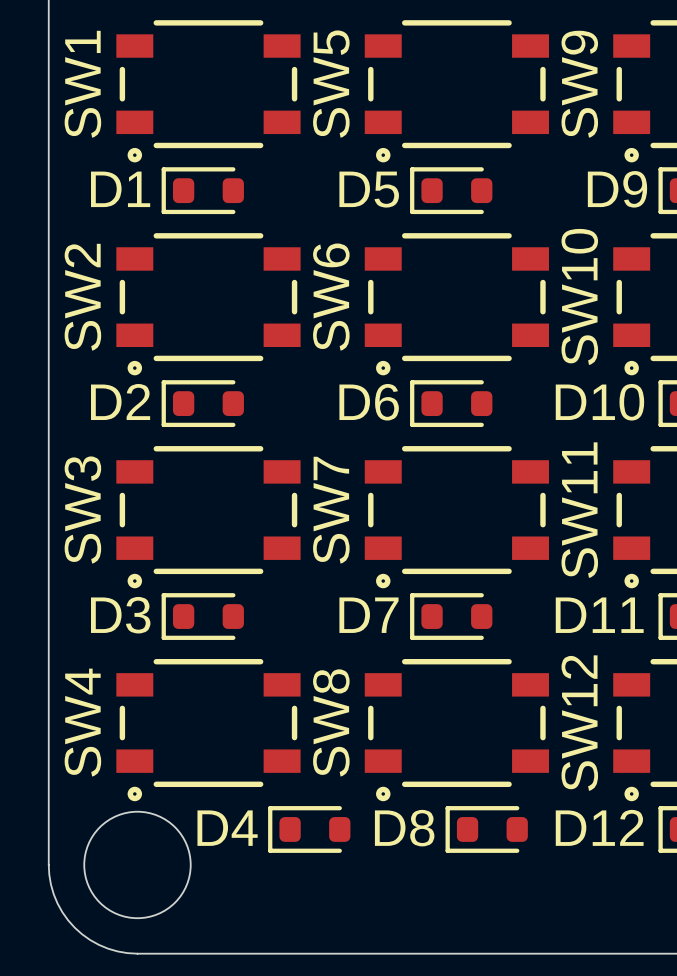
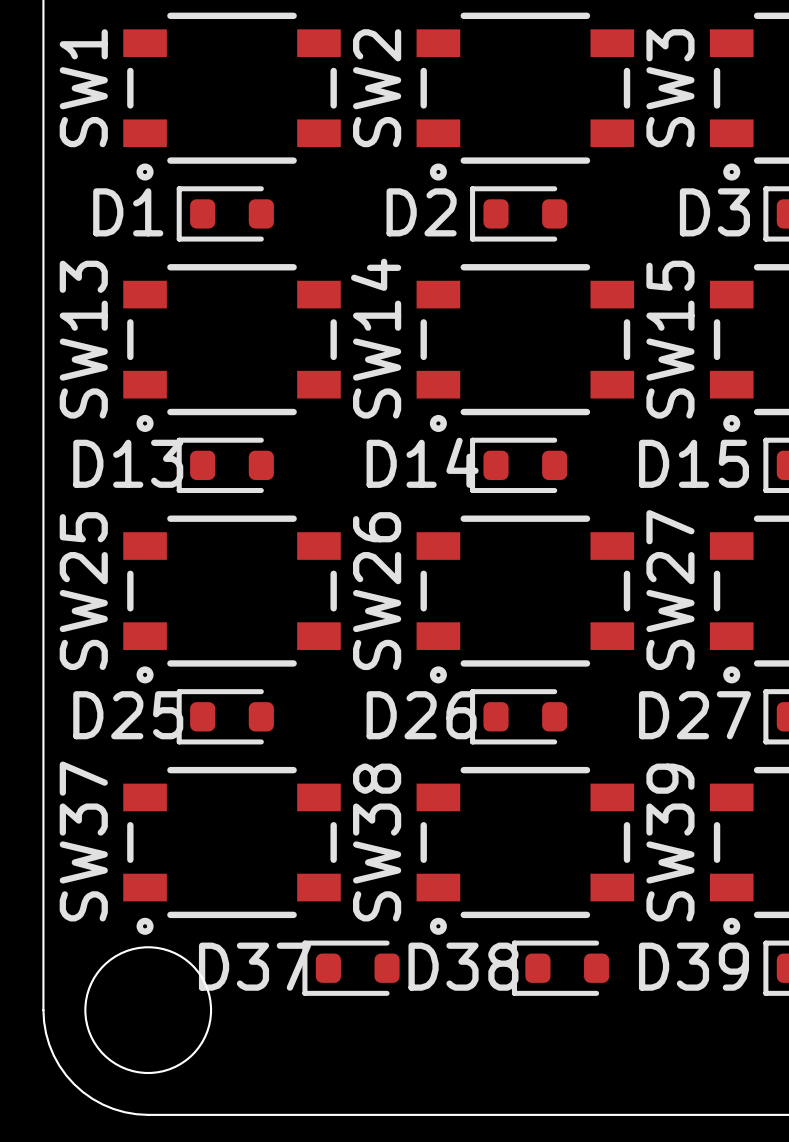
SW5 name: SW5 (331, 84) -> SW2 (377, 88)
SW9 name: SW9 (579, 84) -> SW3 (670, 88)
D5 name: D5 (369, 189) -> D2 (421, 212)
D9 name: D9 (617, 189) -> D3 (714, 212)
SW10 name: SW10 (579, 296) -> SW15 (670, 339)
SW2 name: SW2 (82, 297) -> SW13 (83, 339)
SW6 name: SW6 (331, 297) -> SW14 (376, 338)
D2 name: D2 (120, 402) -> D13 (128, 463)
D6 name: D6 (369, 402) -> D14 (422, 462)
D10 name: D10 (599, 402) -> D15 (693, 463)
SW3 name: SW3 (82, 510) -> SW25 (83, 591)
SW7 name: SW7 (331, 510) -> SW26 (377, 591)
SW11 name: SW11 (579, 510) -> SW27 (670, 590)
D3 name: D3 (120, 615) -> D25 (128, 715)
D7 name: D7 (368, 615) -> D26 (421, 715)
D11 name: D11 (599, 615) -> D27 (694, 715)
SW4 name: SW4 (82, 722) -> SW37 (83, 841)
SW8 name: SW8 (331, 722) -> SW38 (377, 842)
SW12 name: SW12 (579, 723) -> SW39 (670, 842)
D12 name: D12 (599, 827) -> D39 (693, 966)
D4 name: D4 (227, 828) -> D37 (254, 966)
D8 name: D8 (404, 828) -> D38 (463, 966)

